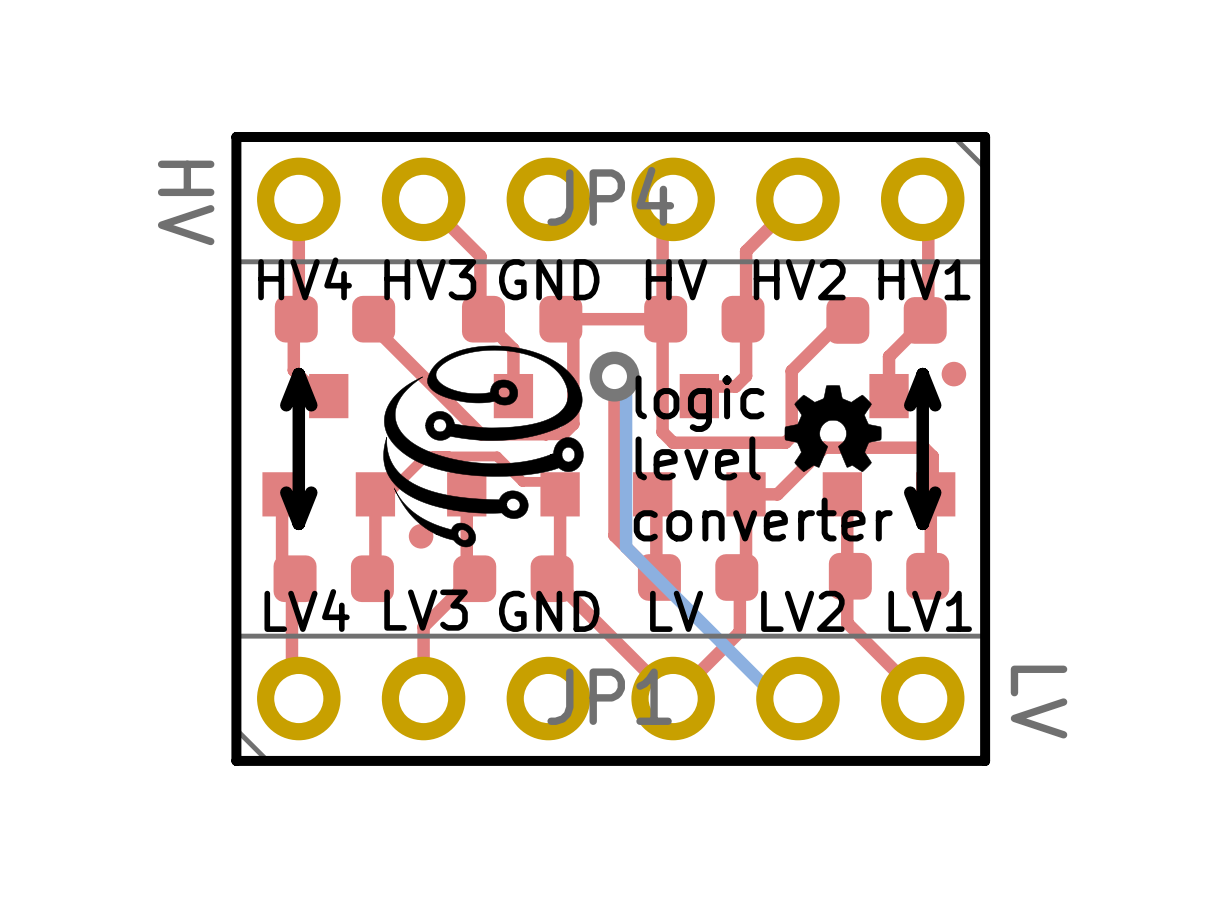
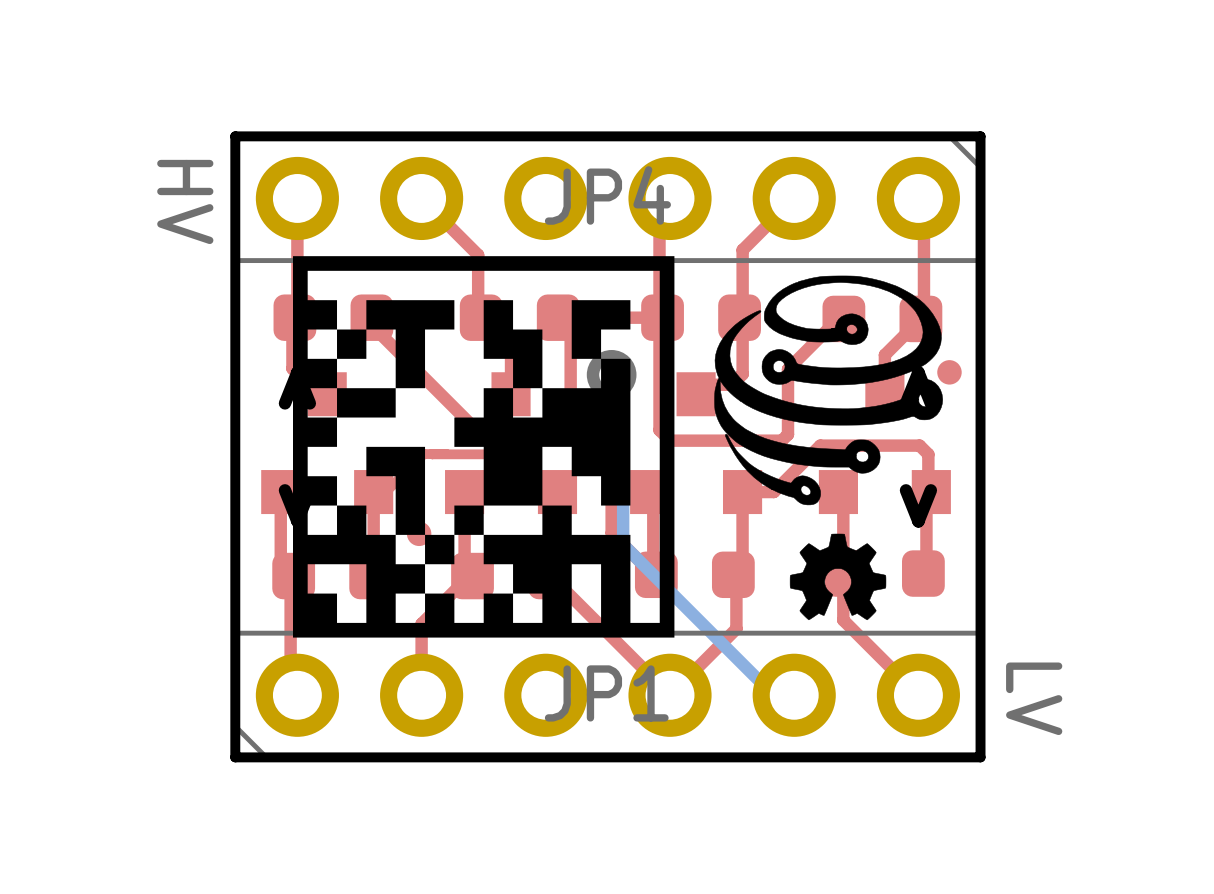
drawing: none -> [714, 275, 943, 506]
text: HV4 (305, 278) -> none
text: HV3 (430, 279) -> none
text: GND (549, 279) -> none
text: HV (676, 279) -> none
text: HV2 (799, 279) -> none
text: HV1 (924, 279) -> none
drawing shape: [383, 345, 584, 548] -> [293, 256, 675, 638]
line: (298, 374) (298, 523) -> none
line: (922, 374) (922, 523) -> none
text: logic (699, 403) -> none
drawing position: (833, 428) -> (838, 576)
text: level (698, 458) -> none
text: converter (763, 519) -> none
text: LV4 (307, 610) -> none
text: LV3 (426, 610) -> none
text: GND (549, 611) -> none
text: LV (676, 611) -> none
text: LV2 (802, 611) -> none
text: LV1 (930, 611) -> none

